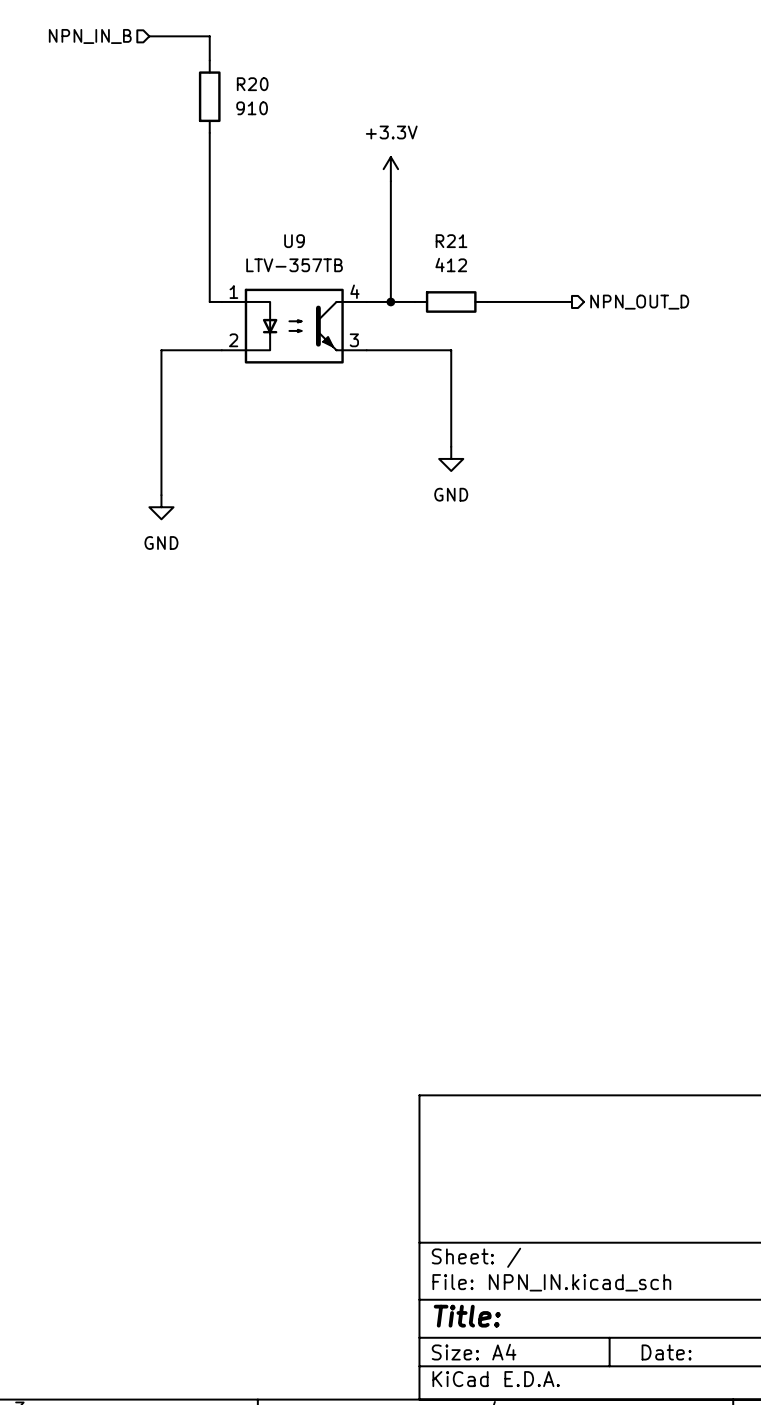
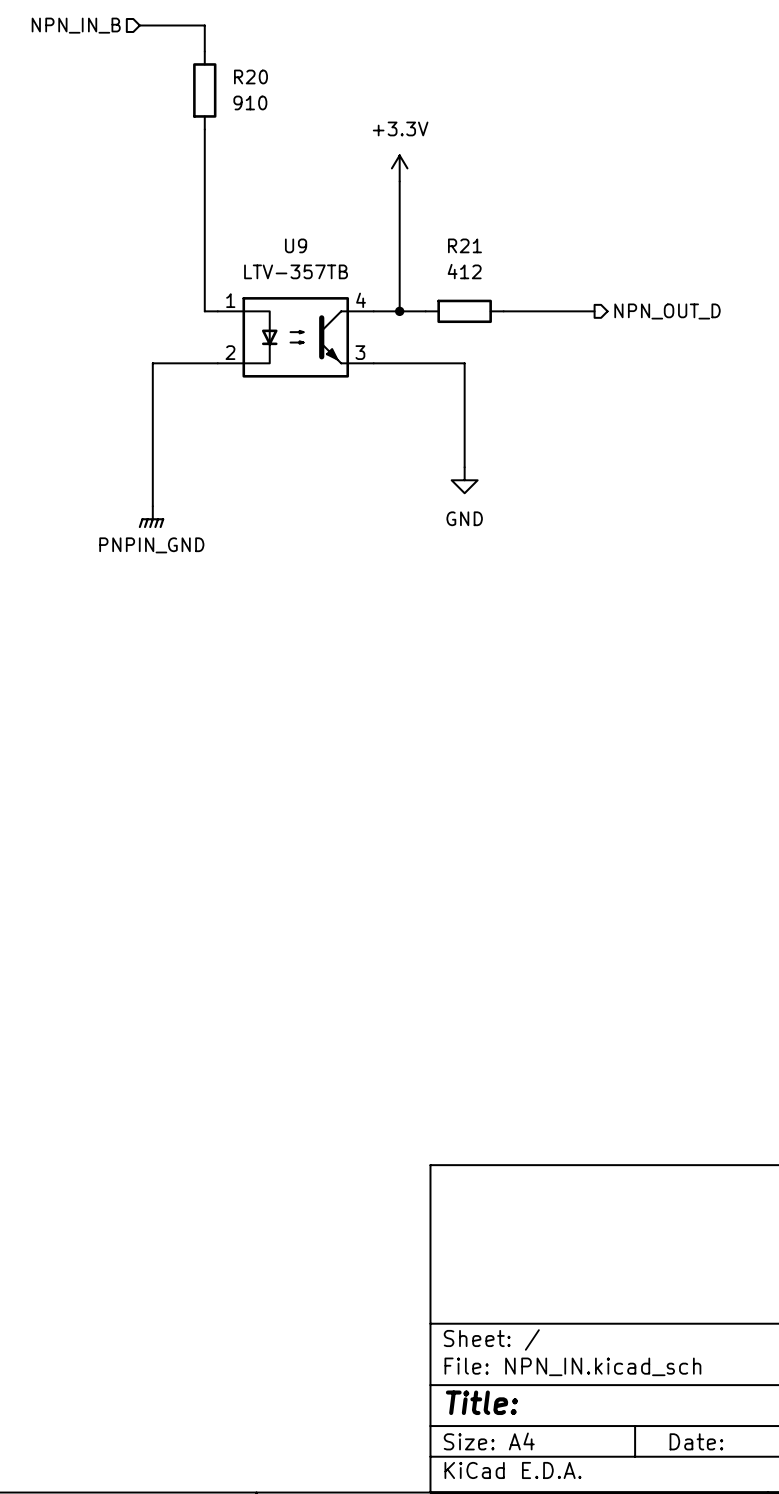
power symbol: none -> PNPIN_GND (151, 517)
power symbol: GND (161, 507) -> none

